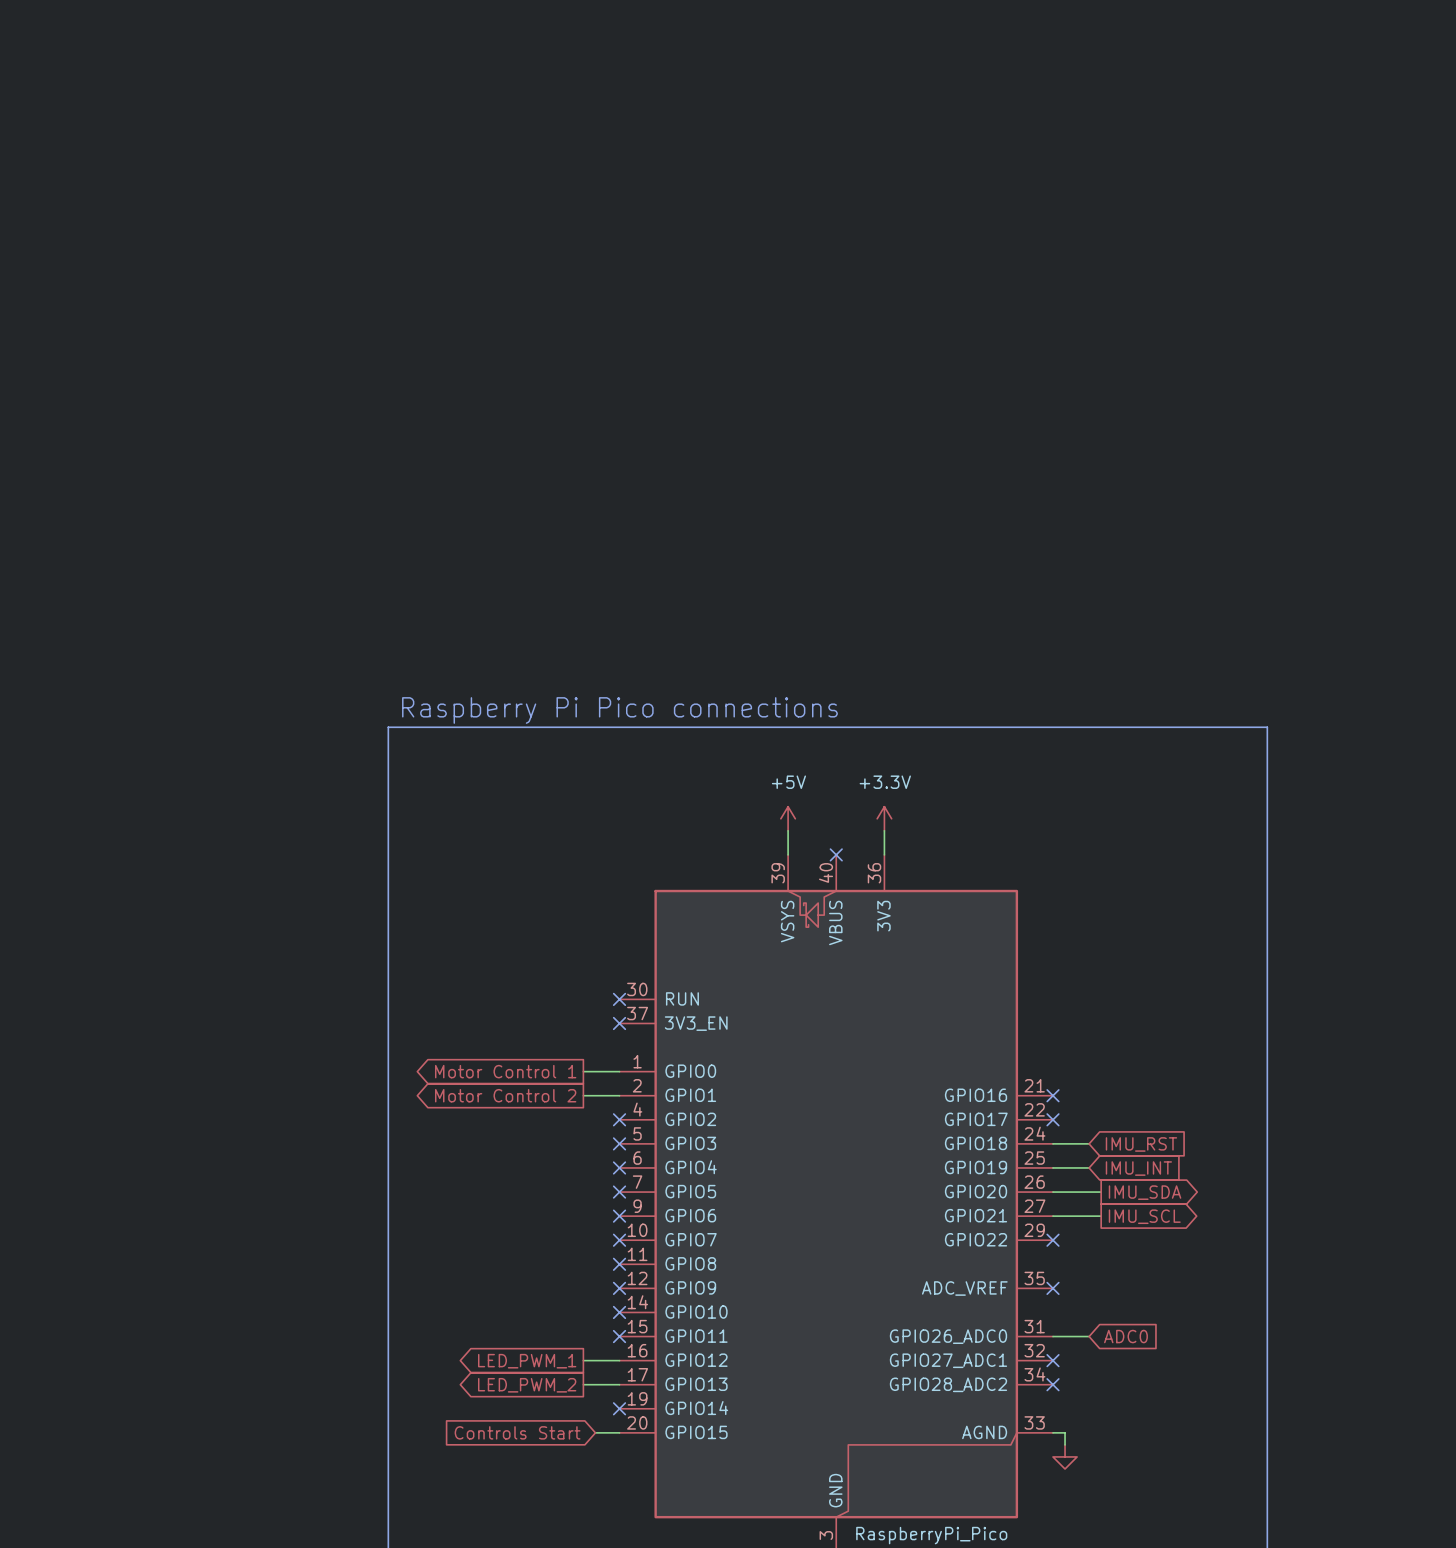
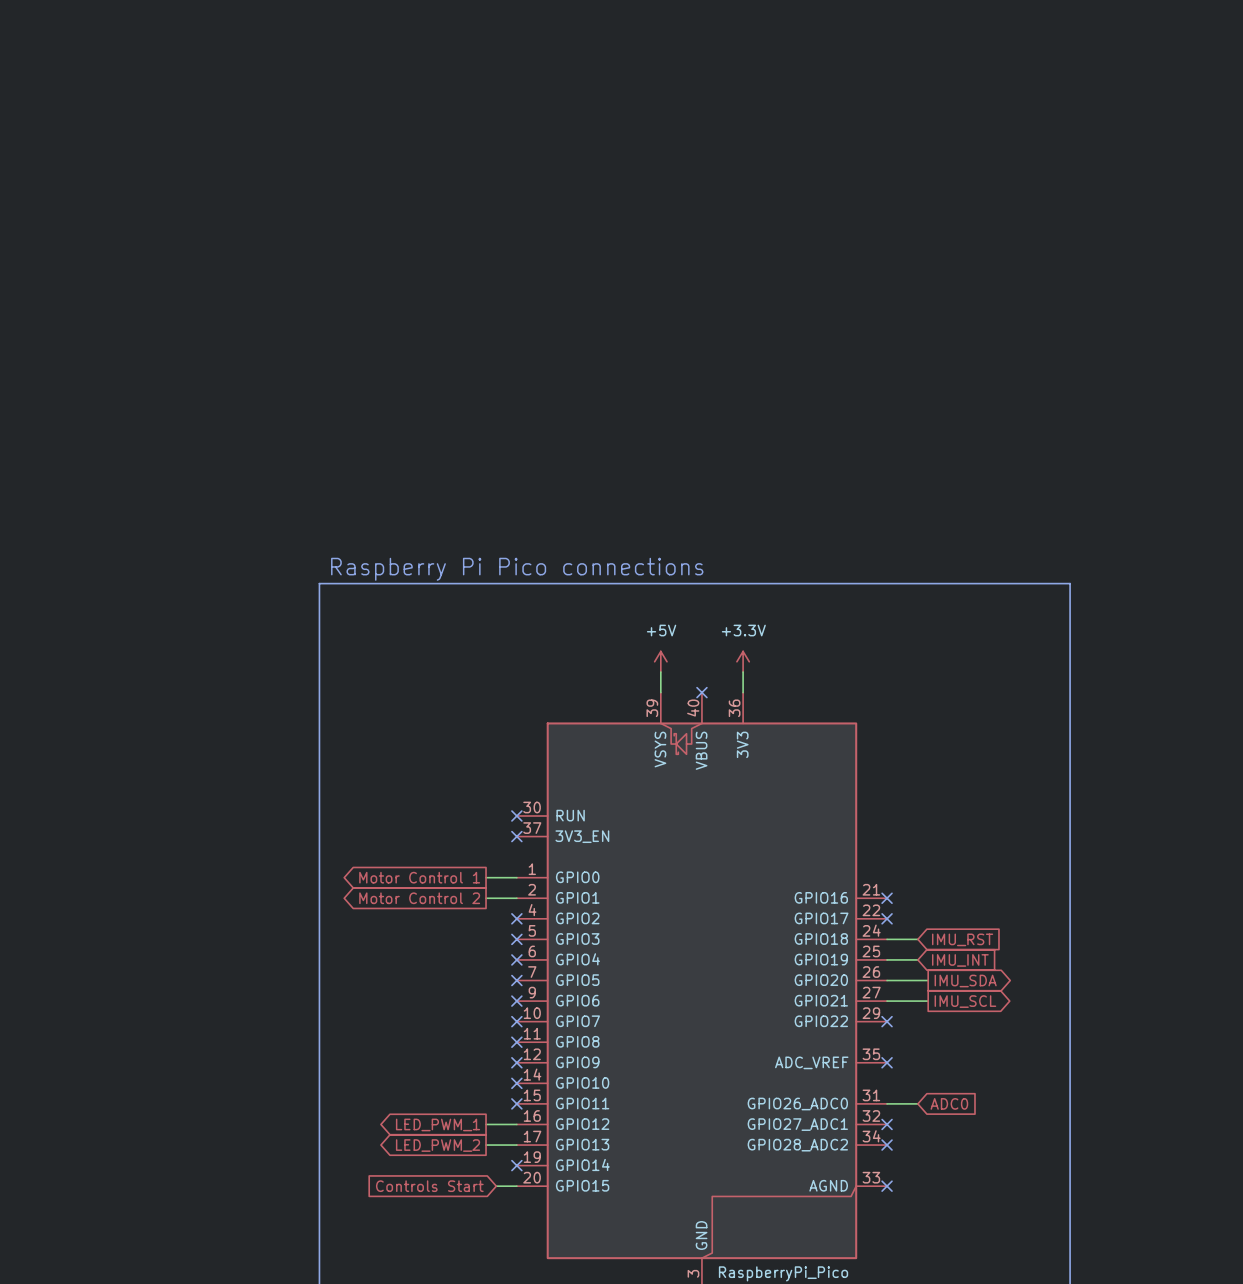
wire: (1052, 1432) (1065, 1432) (1065, 1444) -> none
no-connect mark: none -> (887, 1186)
power symbol: (1065, 1456) -> none

